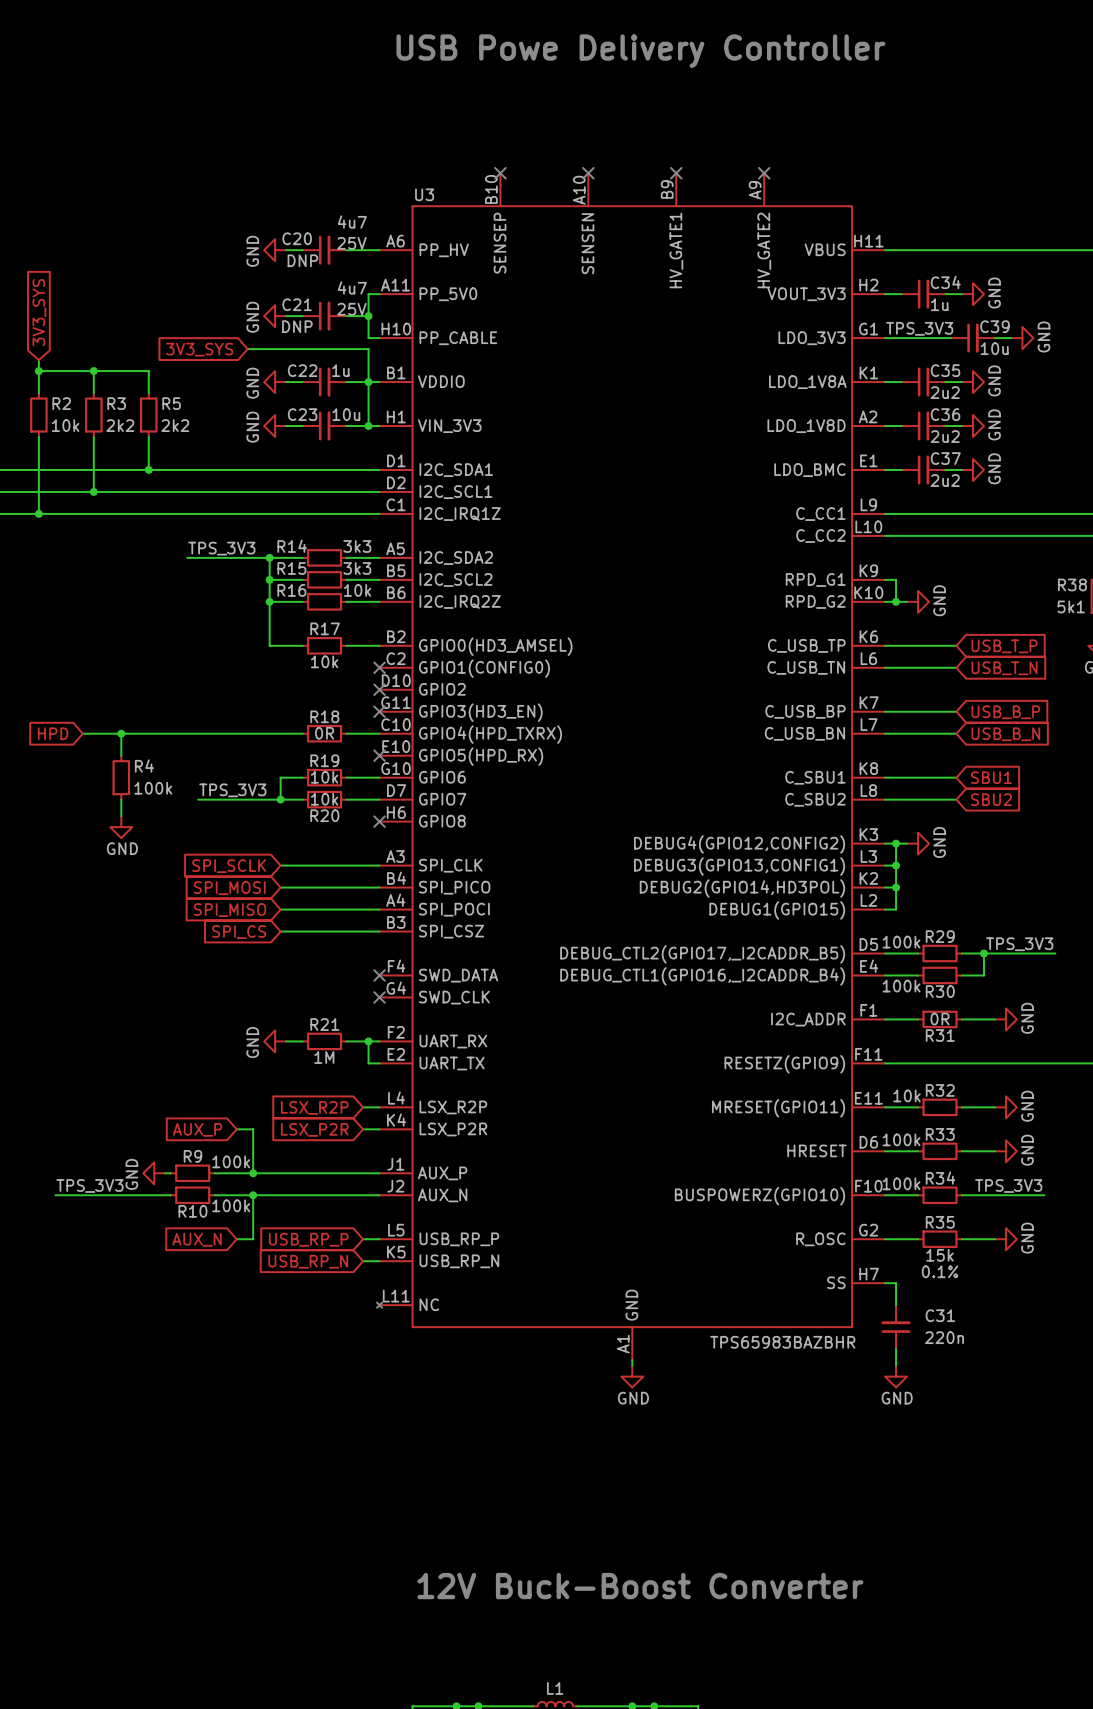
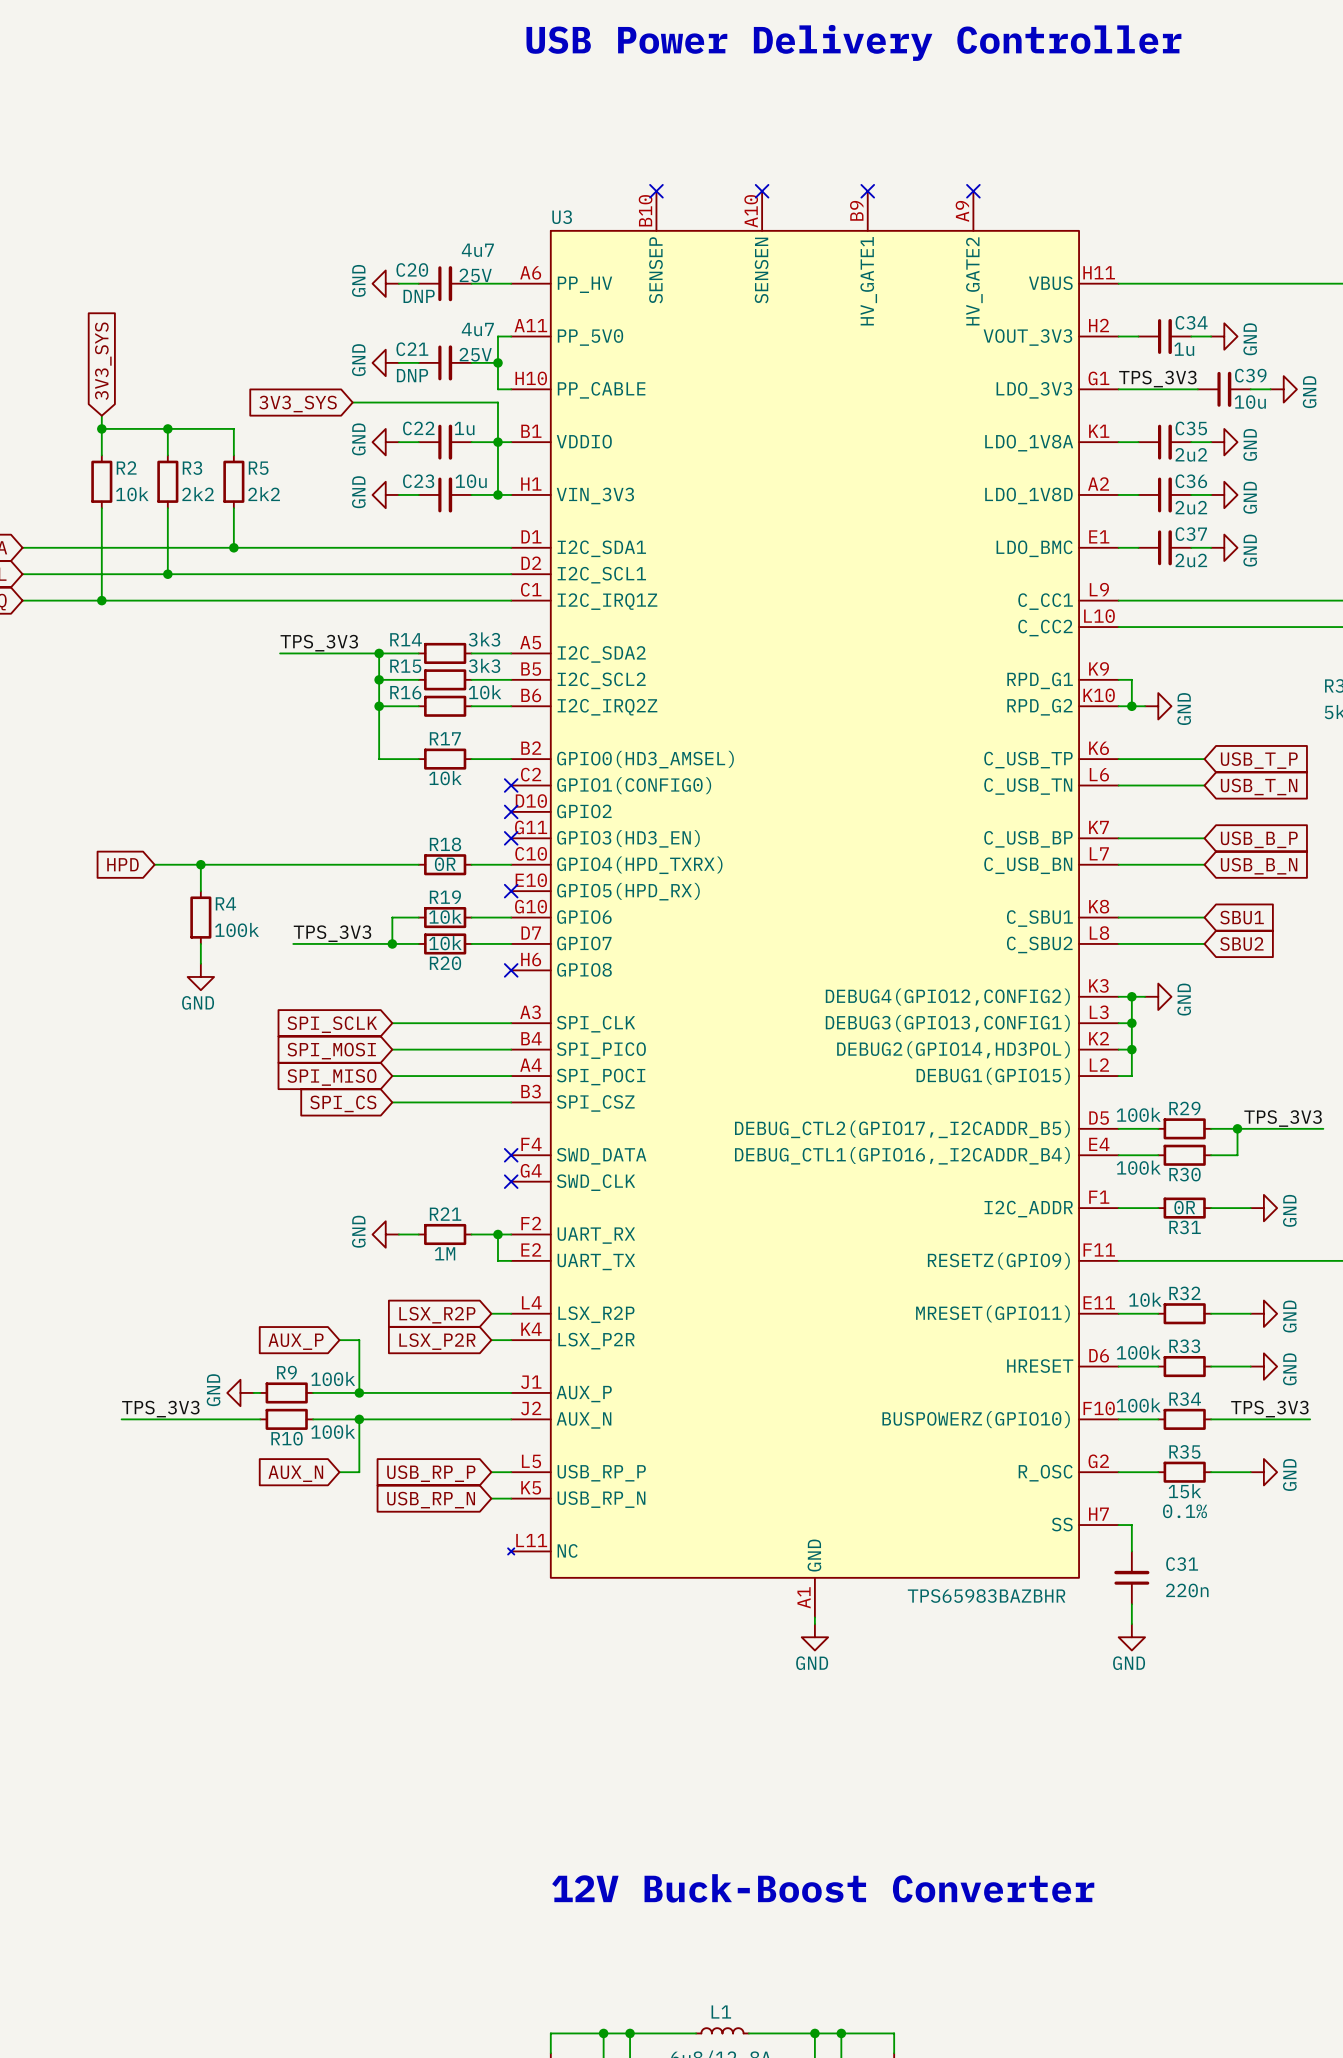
text: USB Powe Delivery Controller (640, 51) -> USB Power Delivery Controller (853, 42)

